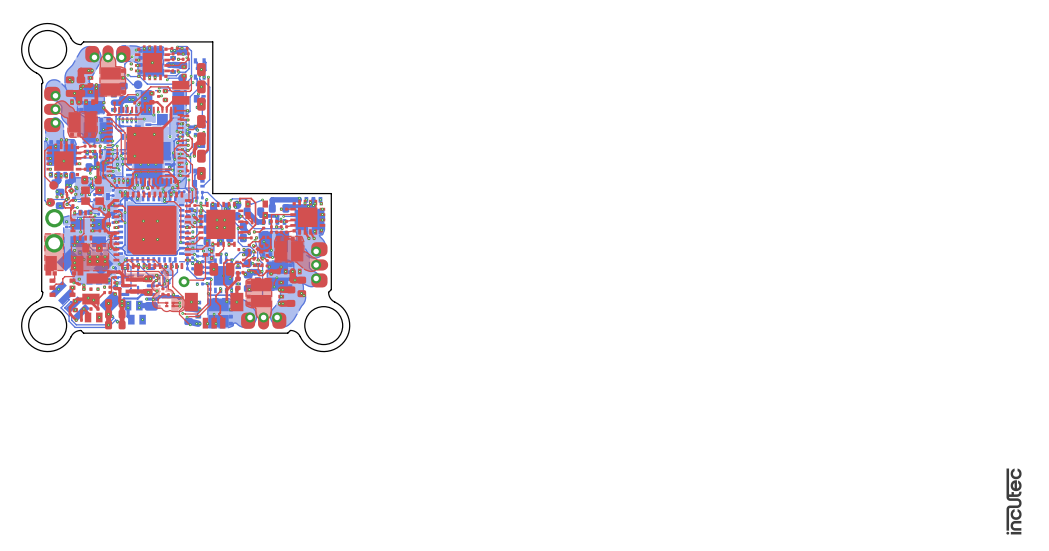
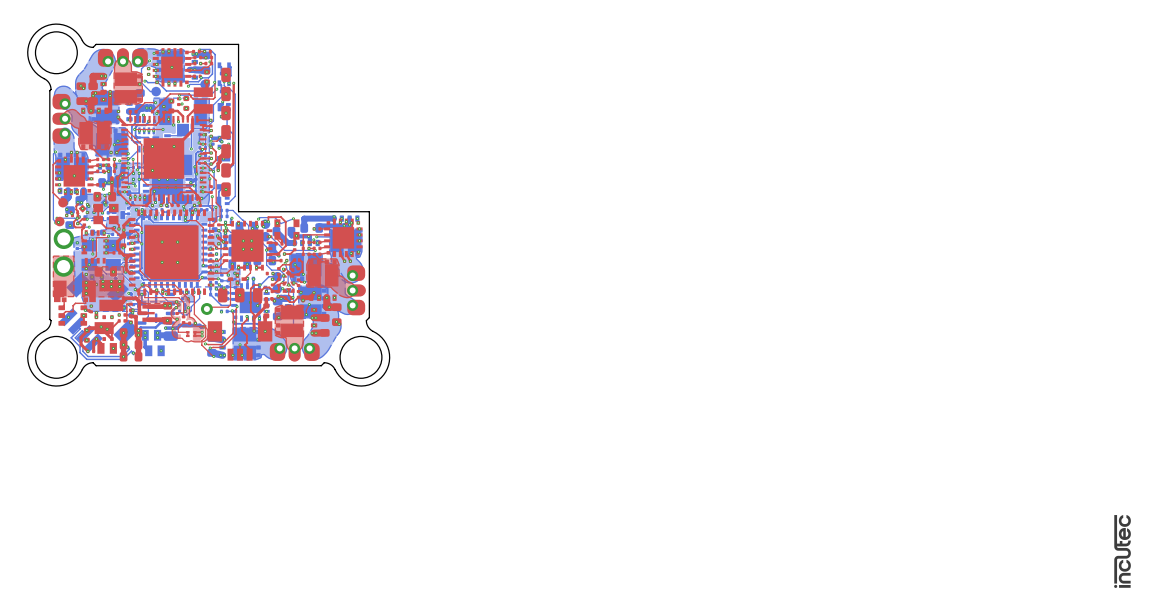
top track: none -> (140, 251) (140, 270) (150, 280) (199, 280) (202, 277)
via: none -> (202, 277)

